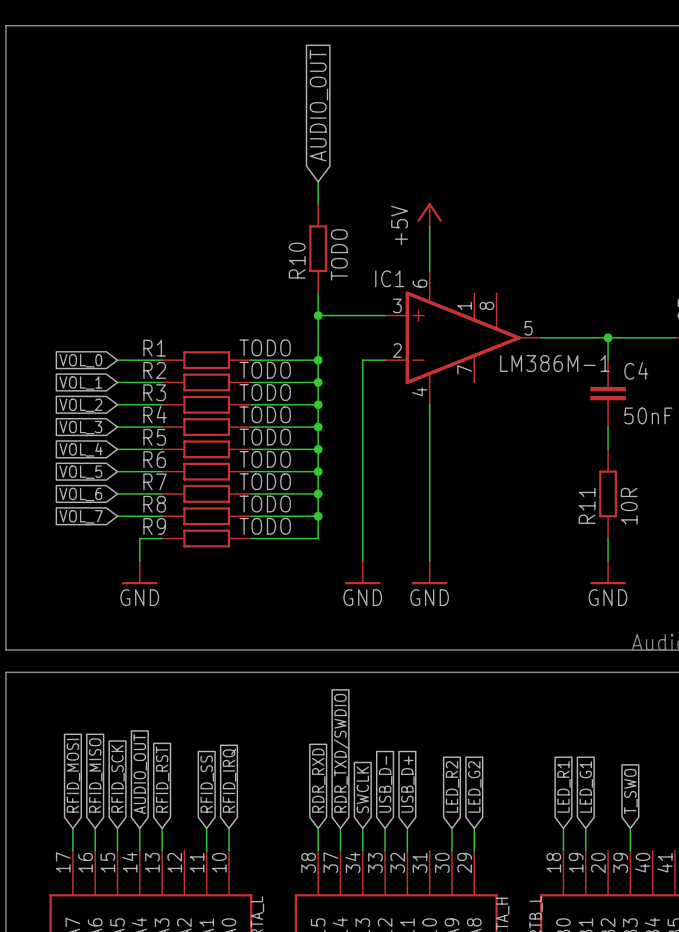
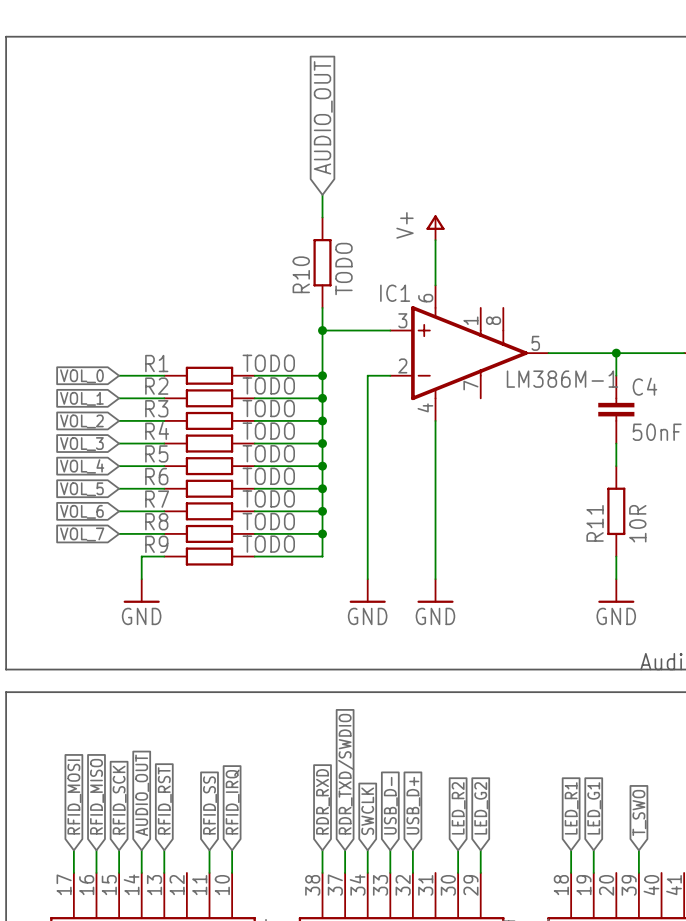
power symbol: +5V (429, 214) -> V+ (435, 227)

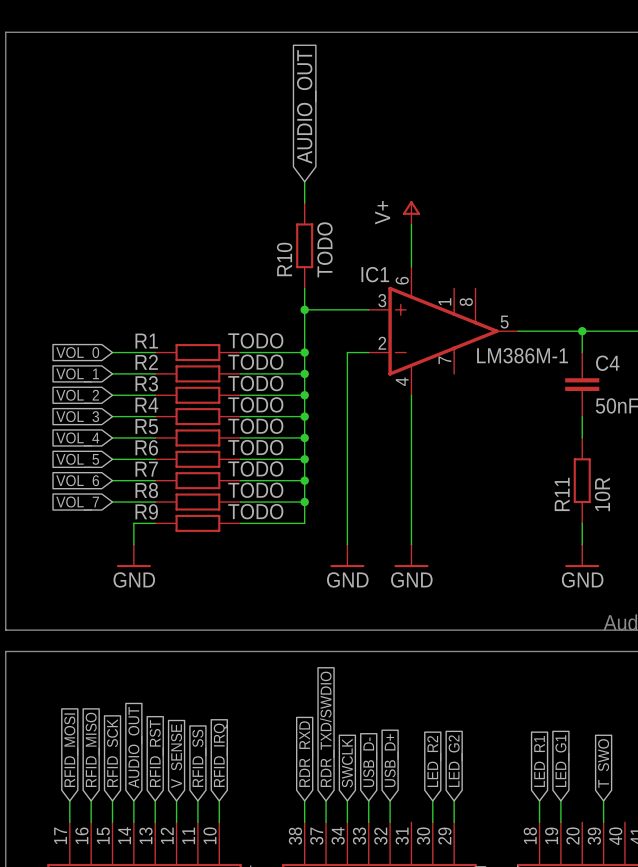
global label: none -> V_SENSE (178, 756)
wire: none -> (176, 800) (176, 822)

